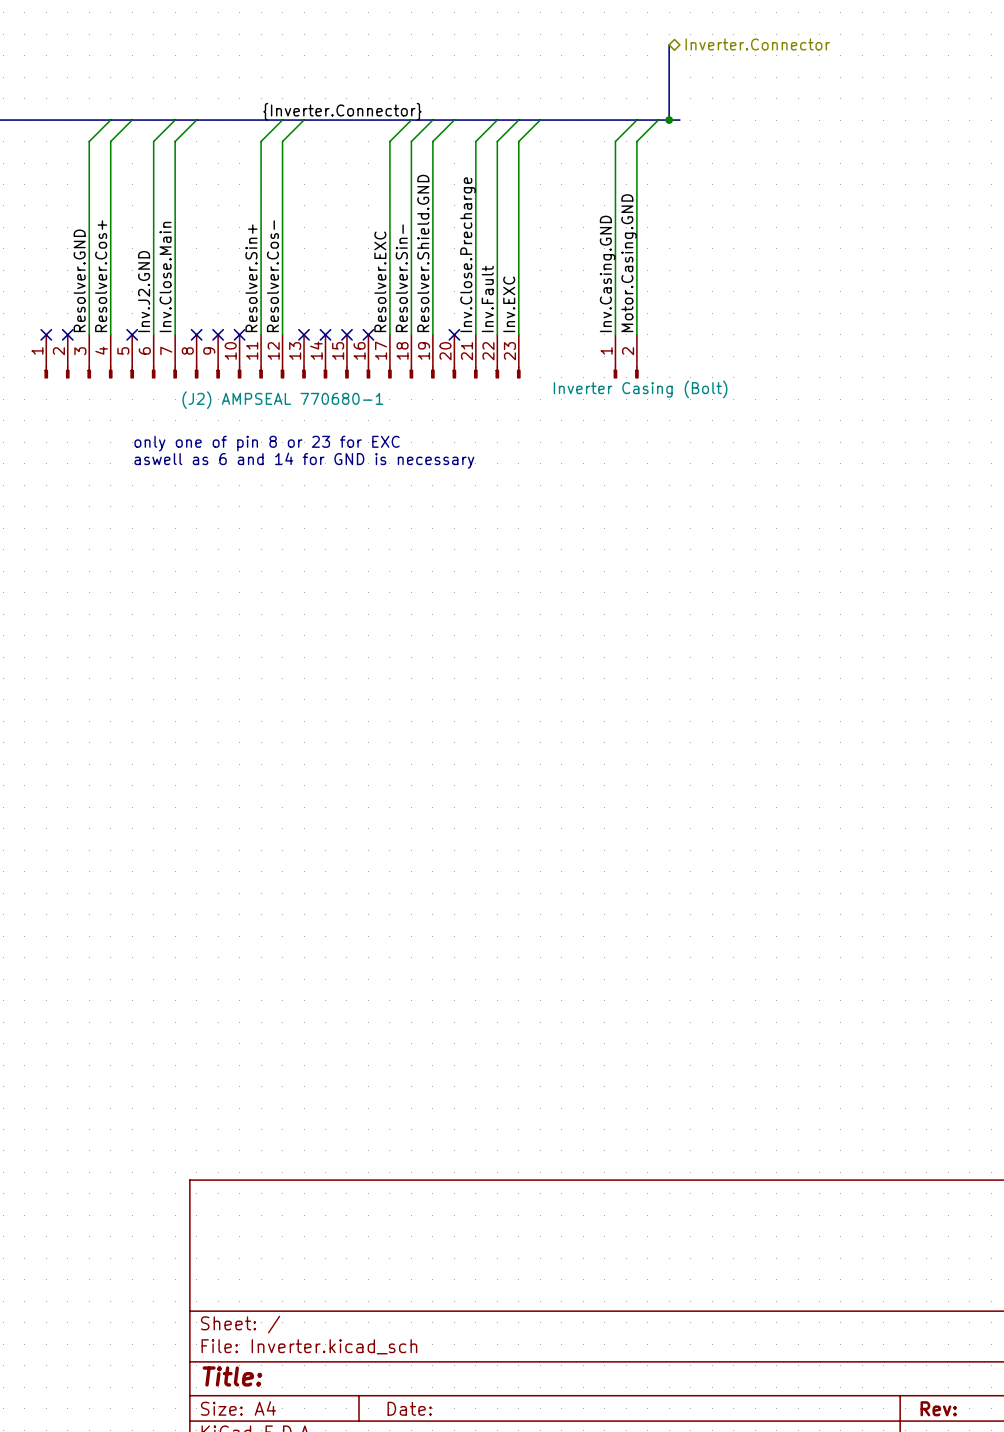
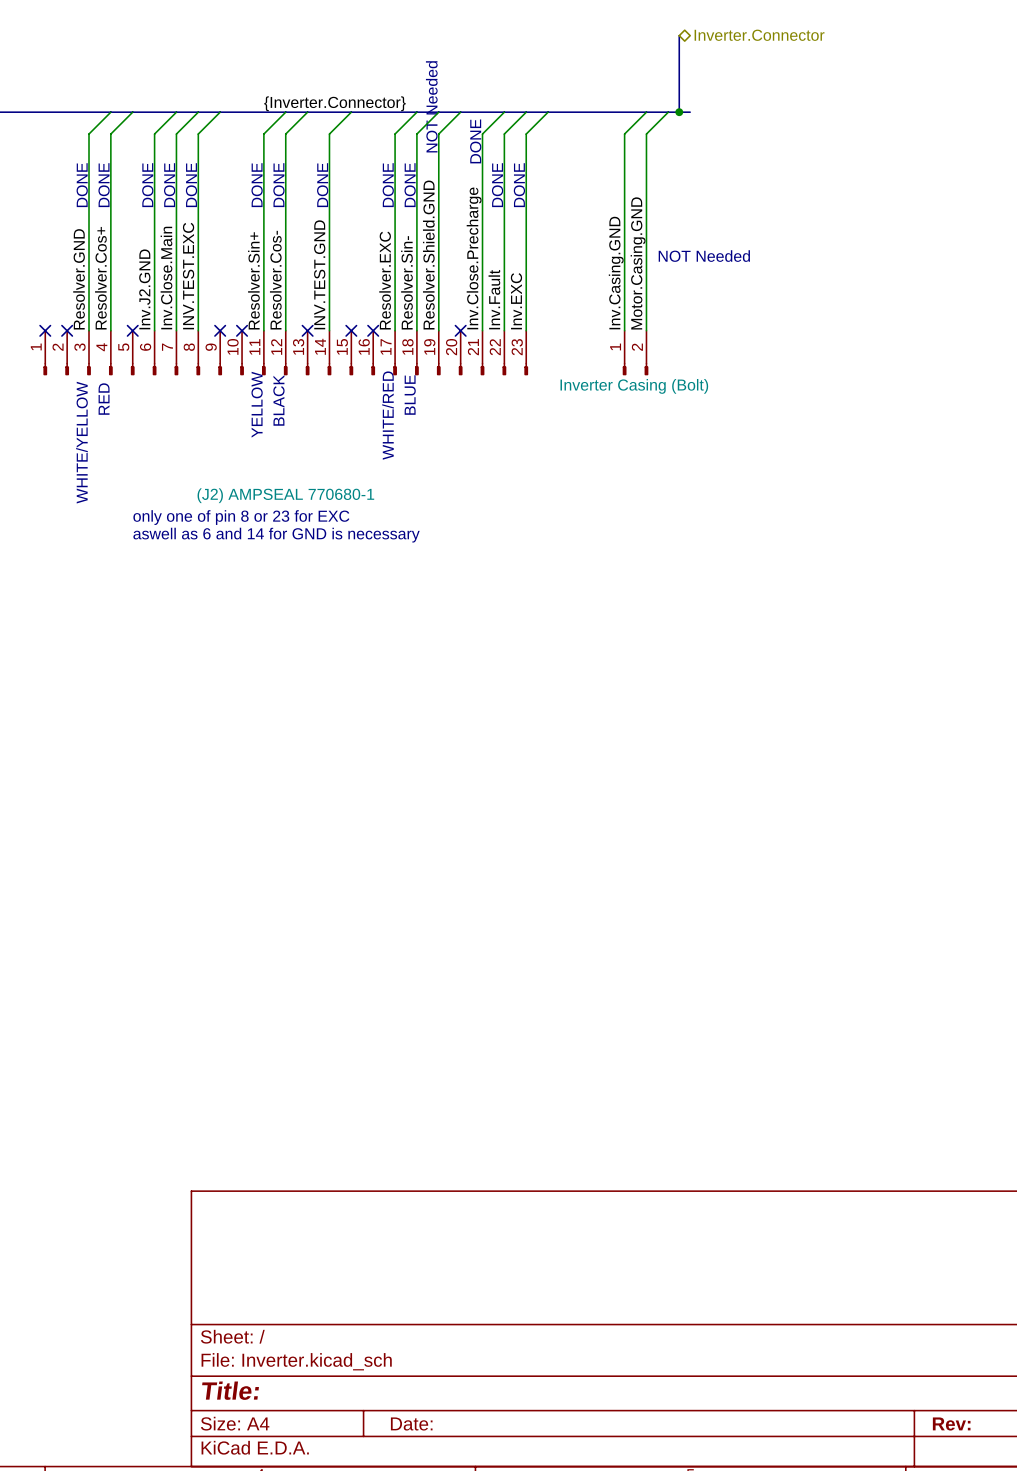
text: none -> NOT Needed (431, 106)
wire: none -> (220, 112) (198, 134) (198, 330)
wire: none -> (351, 112) (329, 134) (329, 330)
text: none -> DONE (475, 141)
text: none -> DONE (82, 185)
text: none -> DONE (104, 185)
text: none -> DONE (147, 185)
text: none -> DONE (169, 185)
text: none -> DONE (191, 185)
text: none -> DONE (257, 185)
text: none -> DONE (278, 185)
text: none -> DONE (322, 185)
text: none -> DONE (388, 185)
text: none -> DONE (410, 185)
text: none -> DONE (497, 185)
text: none -> DONE (519, 185)
text: none -> NOT Needed (704, 256)
label: none -> INV.TEST.GND (319, 274)
label: none -> INV.TEST.EXC (188, 276)
no-connect mark: (196, 334) -> none
no-connect mark: (325, 334) -> none
text: none -> BLUE (410, 395)
part value position: (J2) AMPSEAL 770680-1 (282, 400) -> (J2) AMPSEAL 770680-1 (285, 495)
text: none -> RED (104, 399)
text: none -> BLACK (278, 400)
text: none -> YELLOW (257, 404)
text: none -> WHITE/RED (388, 415)
text position: only one of pin 8 or 23 for EXC (267, 443) -> only one of pin 8 or 23 for EXC (241, 517)
text: none -> WHITE/YELLOW (81, 442)
text position: aswell as 6 and 14 for GND is necessary (304, 460) -> aswell as 6 and 14 for GND is necessary (276, 535)

